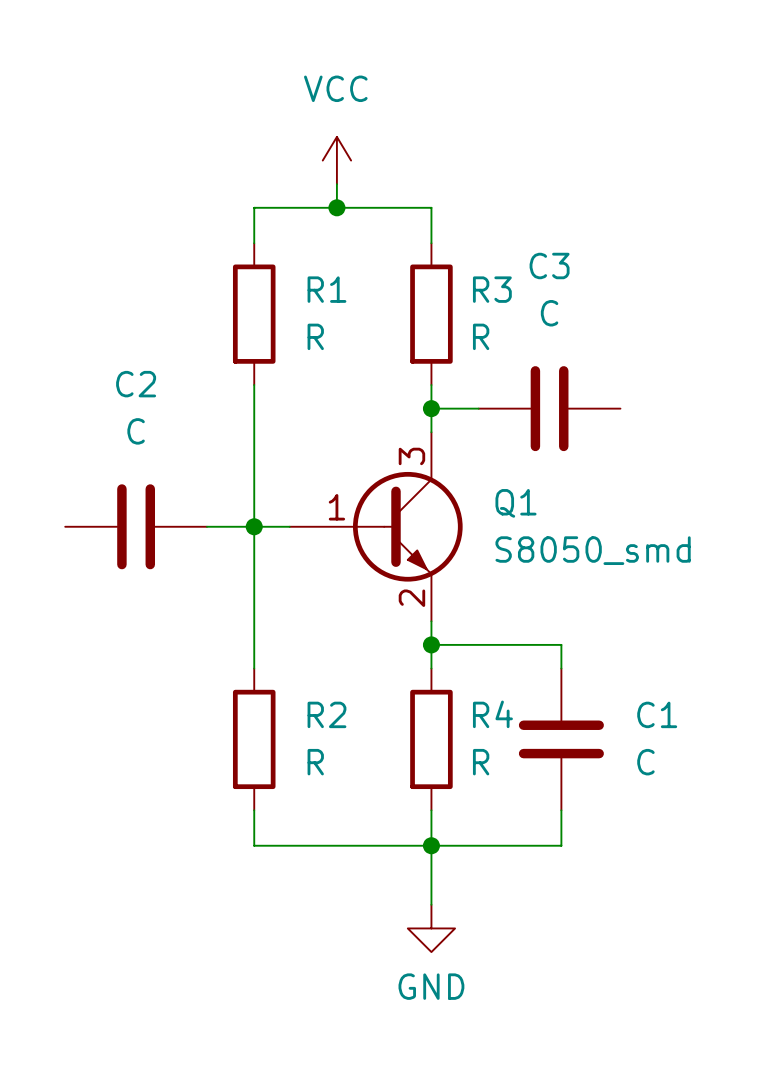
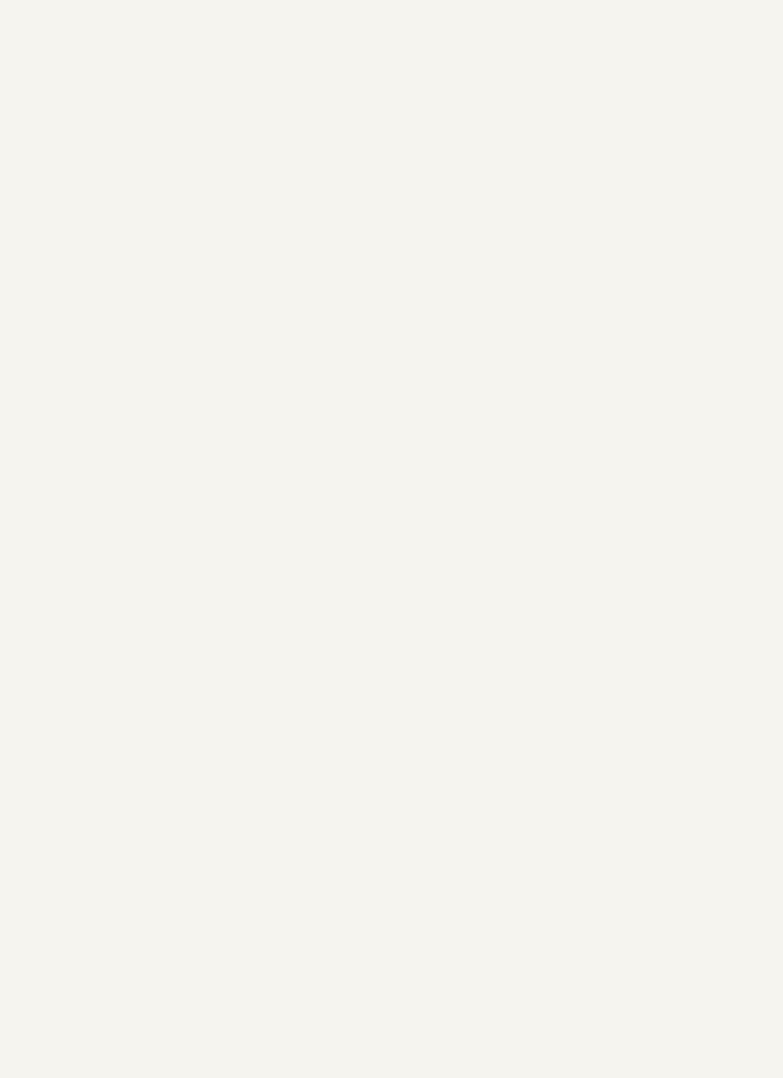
power symbol: VCC (336, 160) -> none
wire: (336, 184) (336, 207) -> none
junction: (336, 207) -> none
wire: (254, 243) (254, 207) (431, 207) (431, 243) -> none
R1: R (254, 314) -> none
R3: R (431, 314) -> none
wire: (254, 385) (254, 668) -> none
wire: (431, 385) (431, 432) -> none
wire: (431, 408) (478, 408) -> none
junction: (431, 408) -> none
C3: C (549, 408) -> none
C2: C (136, 526) -> none
wire: (206, 526) (289, 526) -> none
junction: (254, 526) -> none
Q1: S8050_smd (376, 526) -> none
wire: (431, 621) (431, 668) -> none
wire: (431, 644) (561, 644) (561, 668) -> none
junction: (431, 644) -> none
R2: R (254, 739) -> none
R4: R (431, 739) -> none
C1: C (561, 739) -> none
wire: (254, 810) (254, 845) (561, 845) (561, 810) -> none
wire: (431, 810) (431, 904) -> none
junction: (431, 845) -> none
power symbol: GND (431, 928) -> none

